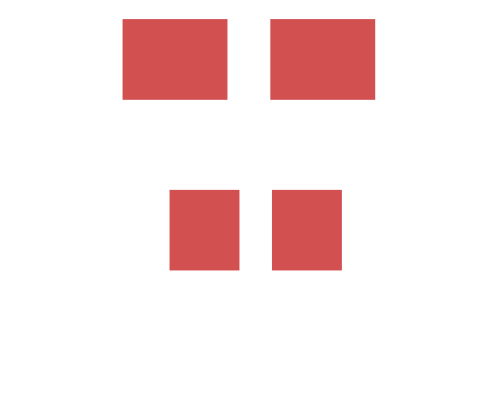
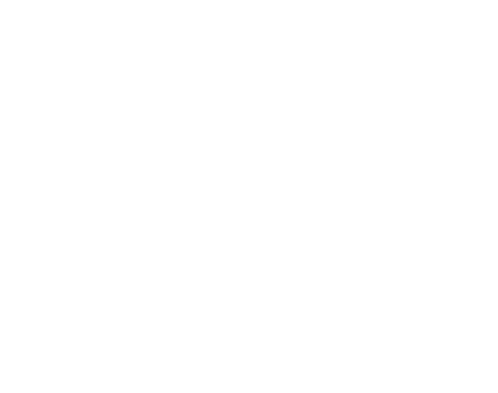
part: (248, 59) -> none
part: (255, 230) -> none

